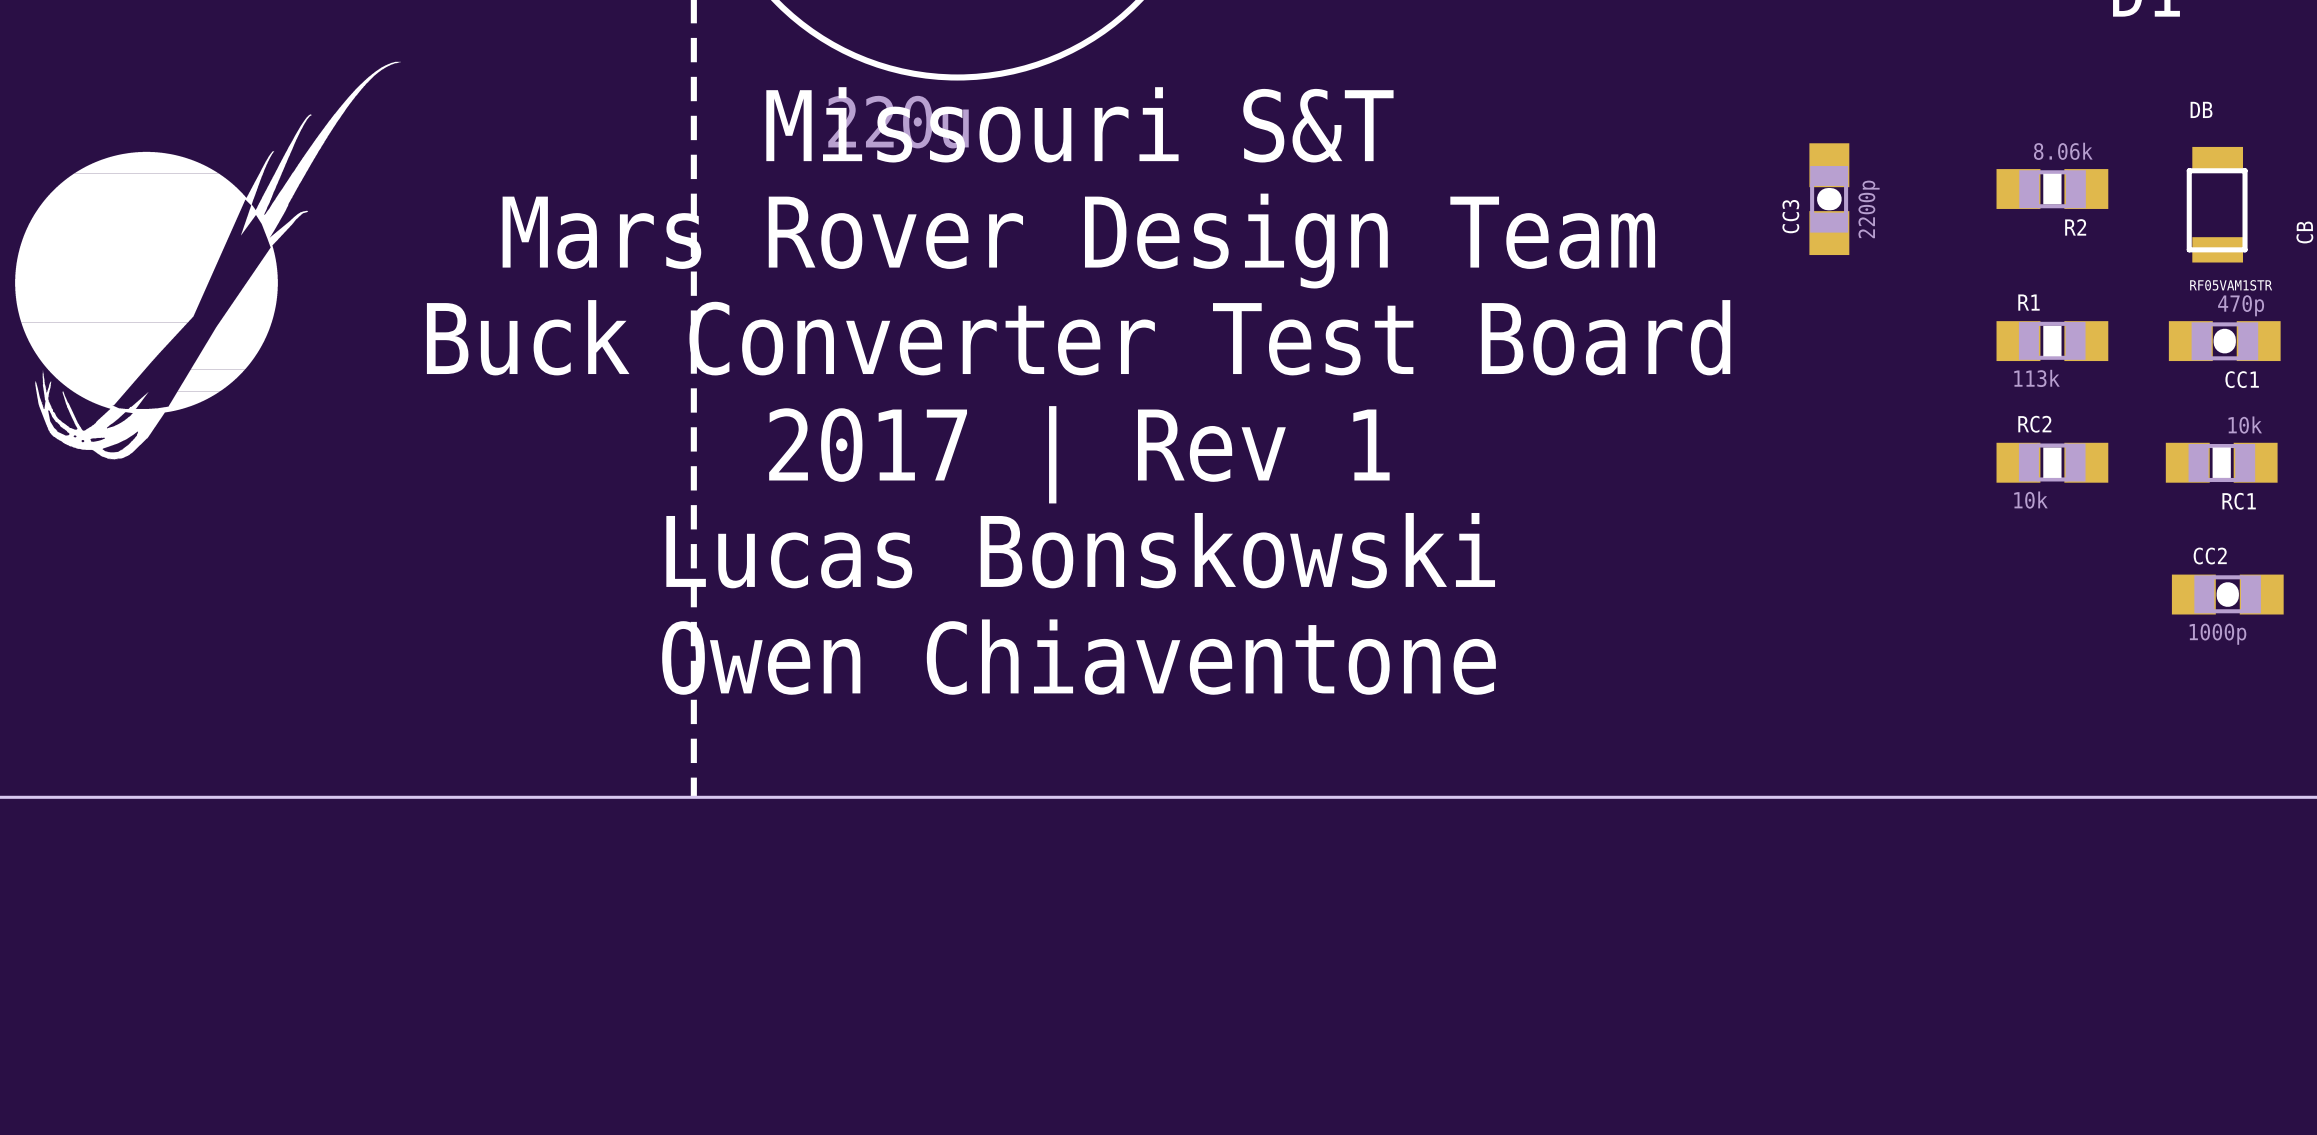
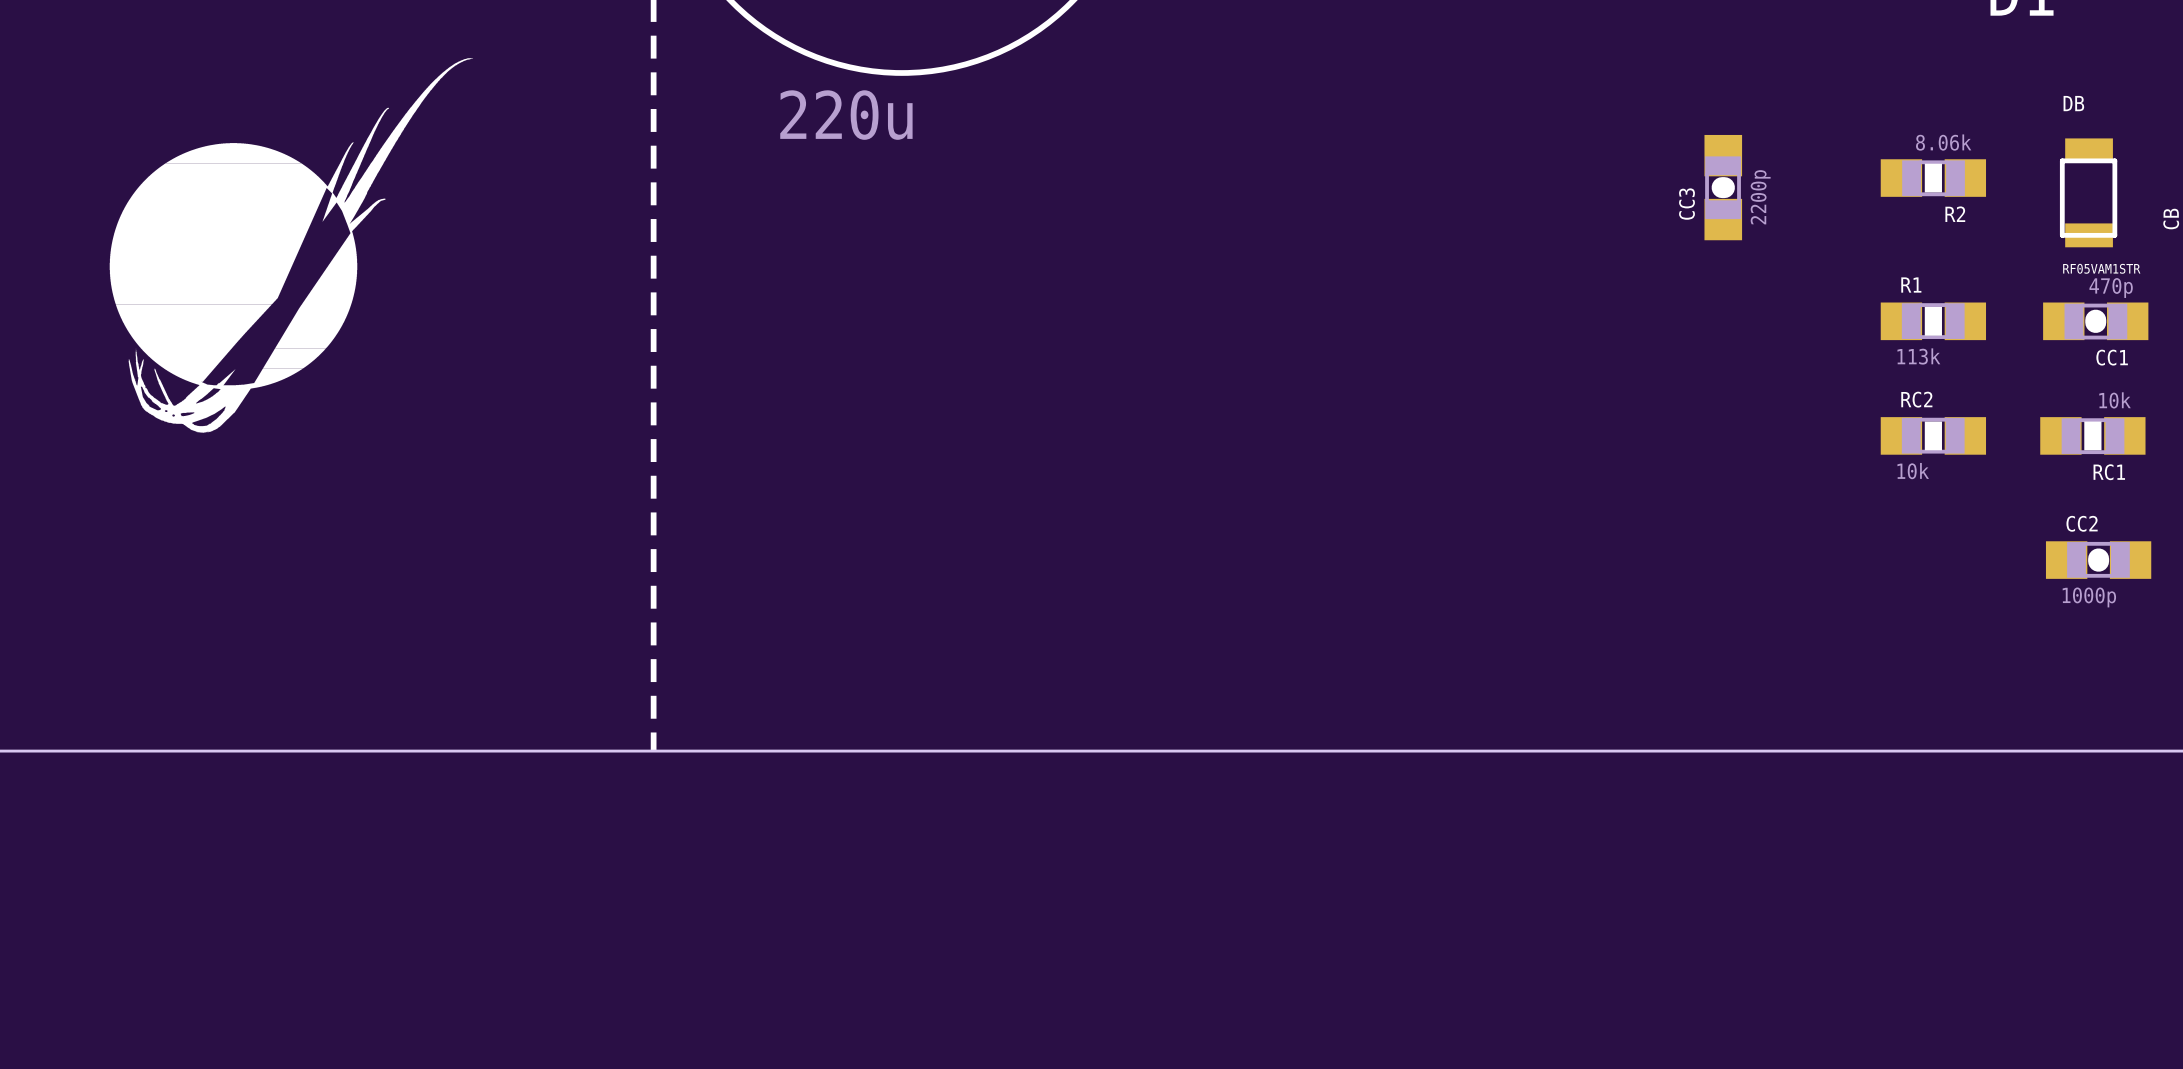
text: Missouri S&T (1079, 124) -> none
text: Mars Rover Design Team (1078, 241) -> none
drawing position: (207, 260) -> (291, 245)
text: Buck Converter Test Board (1078, 337) -> none
text: 2017 | Rev 1 (1079, 454) -> none
text: Lucas Bonskowski (1080, 550) -> none
text: Owen Chiaventone (1079, 657) -> none

